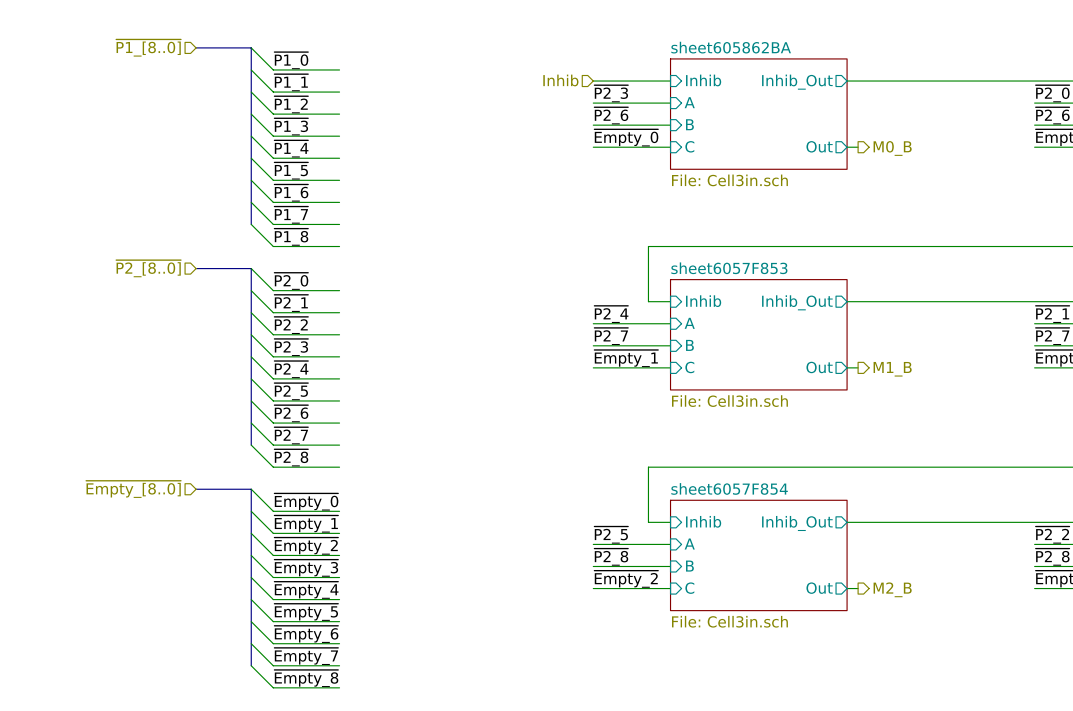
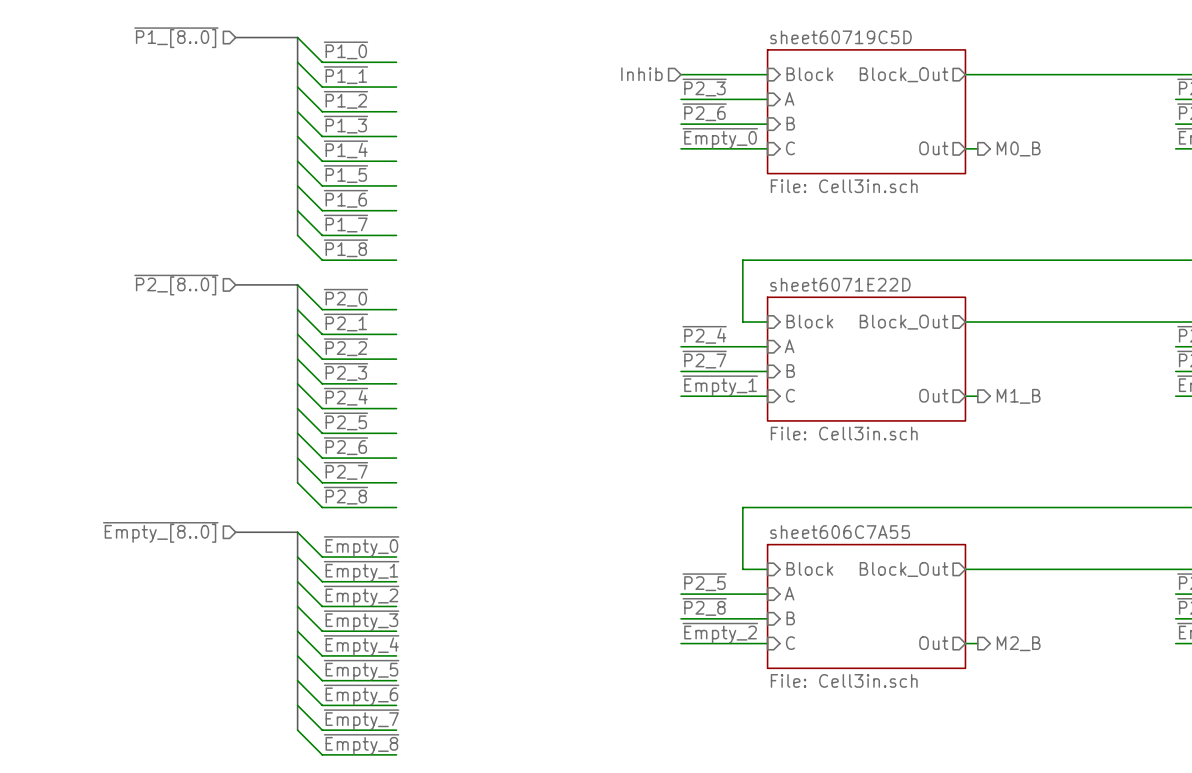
sheet sheet605862BA name: sheet605862BA (731, 47) -> sheet60719C5D (840, 37)
sheet pin: Inhib (703, 80) -> Block (809, 74)
sheet pin: Inhib_Out (797, 82) -> Block_Out (904, 74)
sheet sheet6057F853 name: sheet6057F853 (729, 268) -> sheet6071E22D (840, 284)
sheet pin: Inhib (703, 301) -> Block (809, 321)
sheet pin: Inhib_Out (797, 302) -> Block_Out (904, 322)
sheet sheet6057F854 name: sheet6057F854 (729, 488) -> sheet606C7A55 (840, 532)
sheet pin: Inhib (703, 521) -> Block (809, 568)
sheet pin: Inhib_Out (797, 523) -> Block_Out (904, 569)

